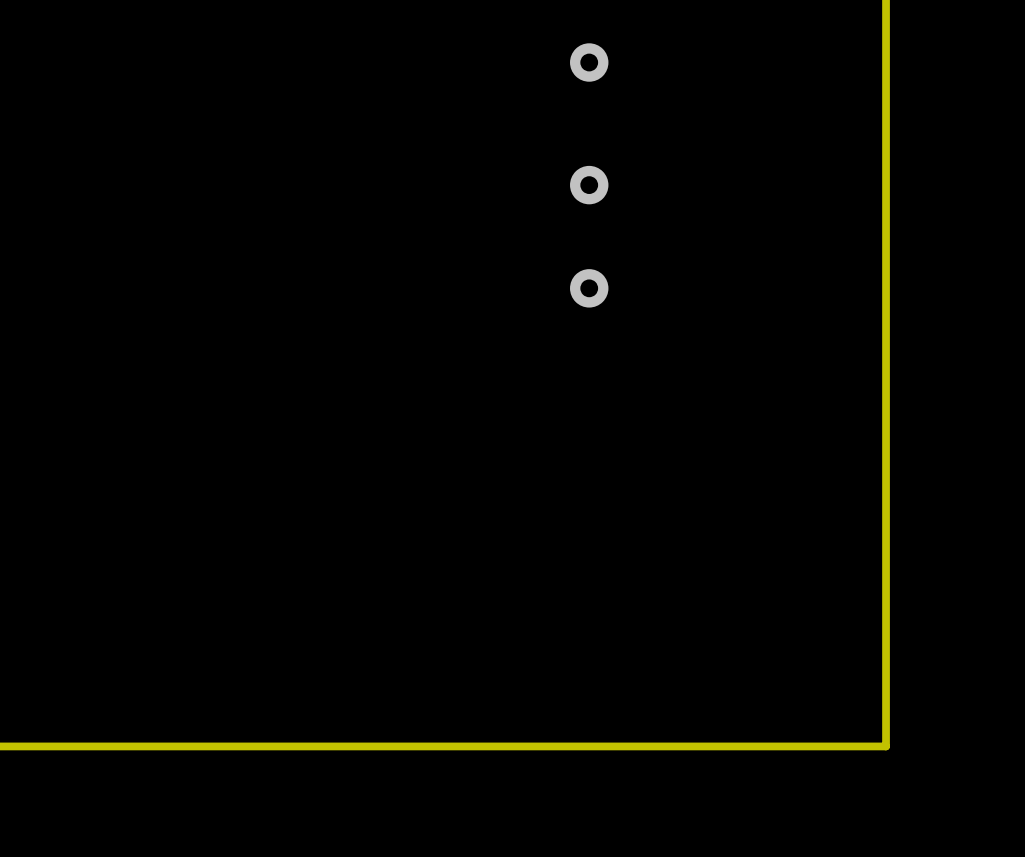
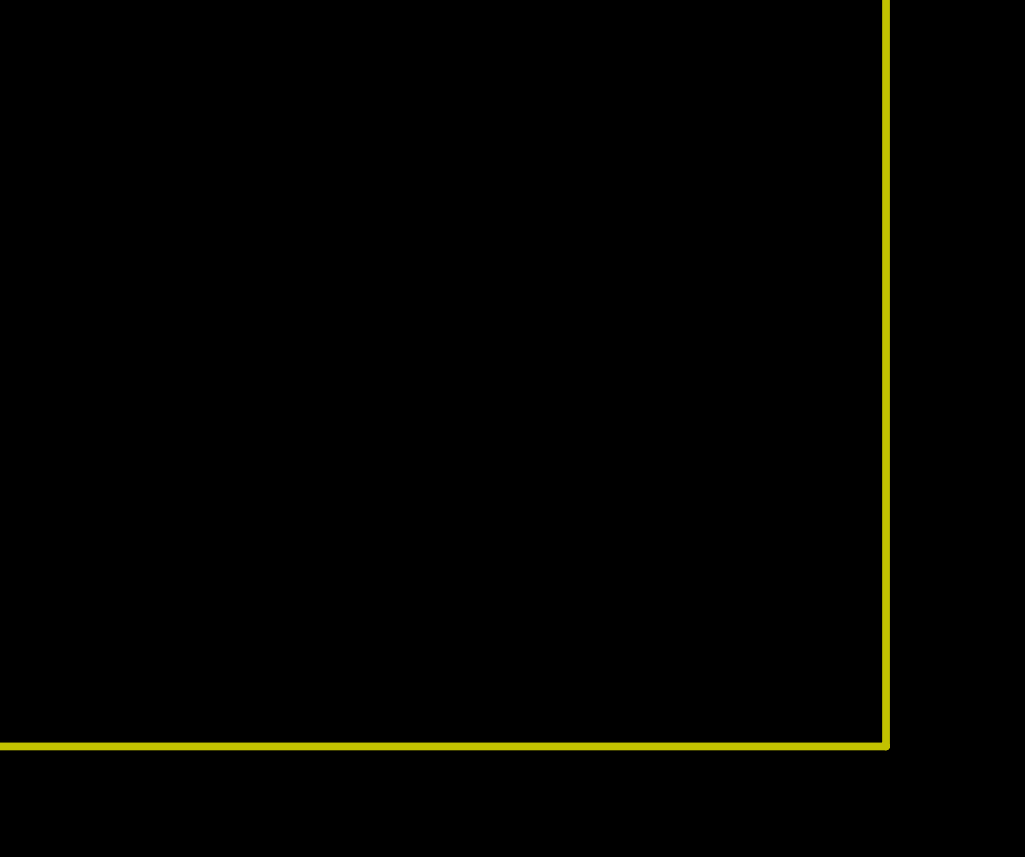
via: (589, 62) -> none
via: (589, 185) -> none
via: (589, 288) -> none

